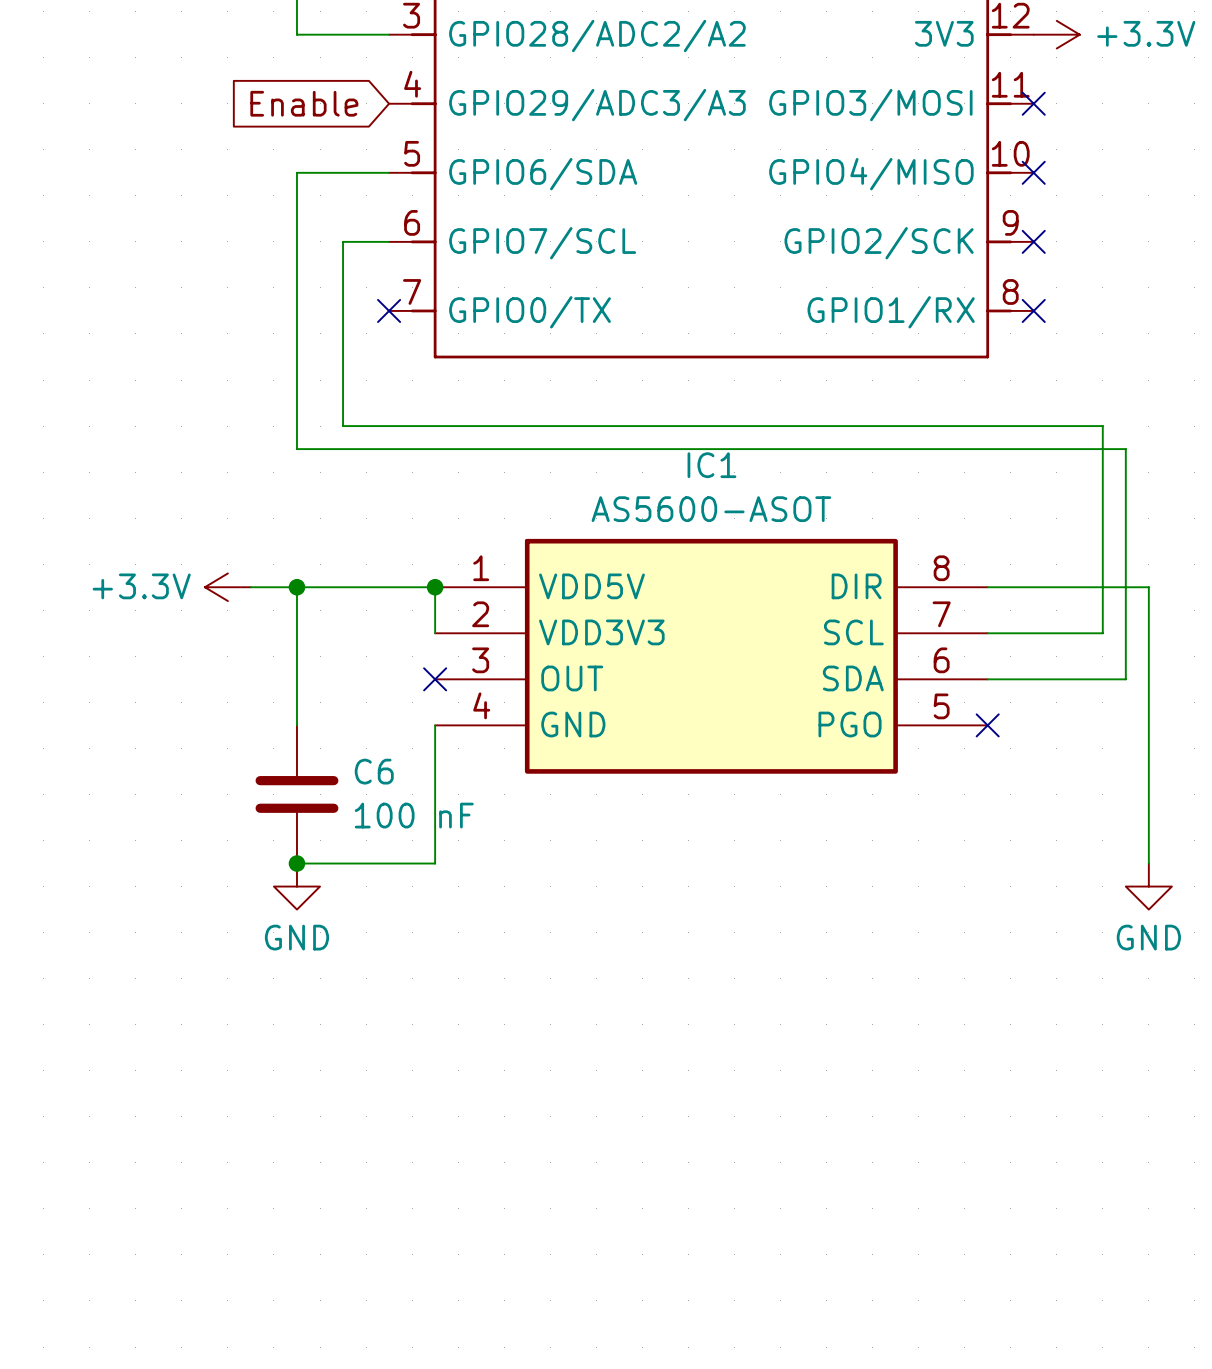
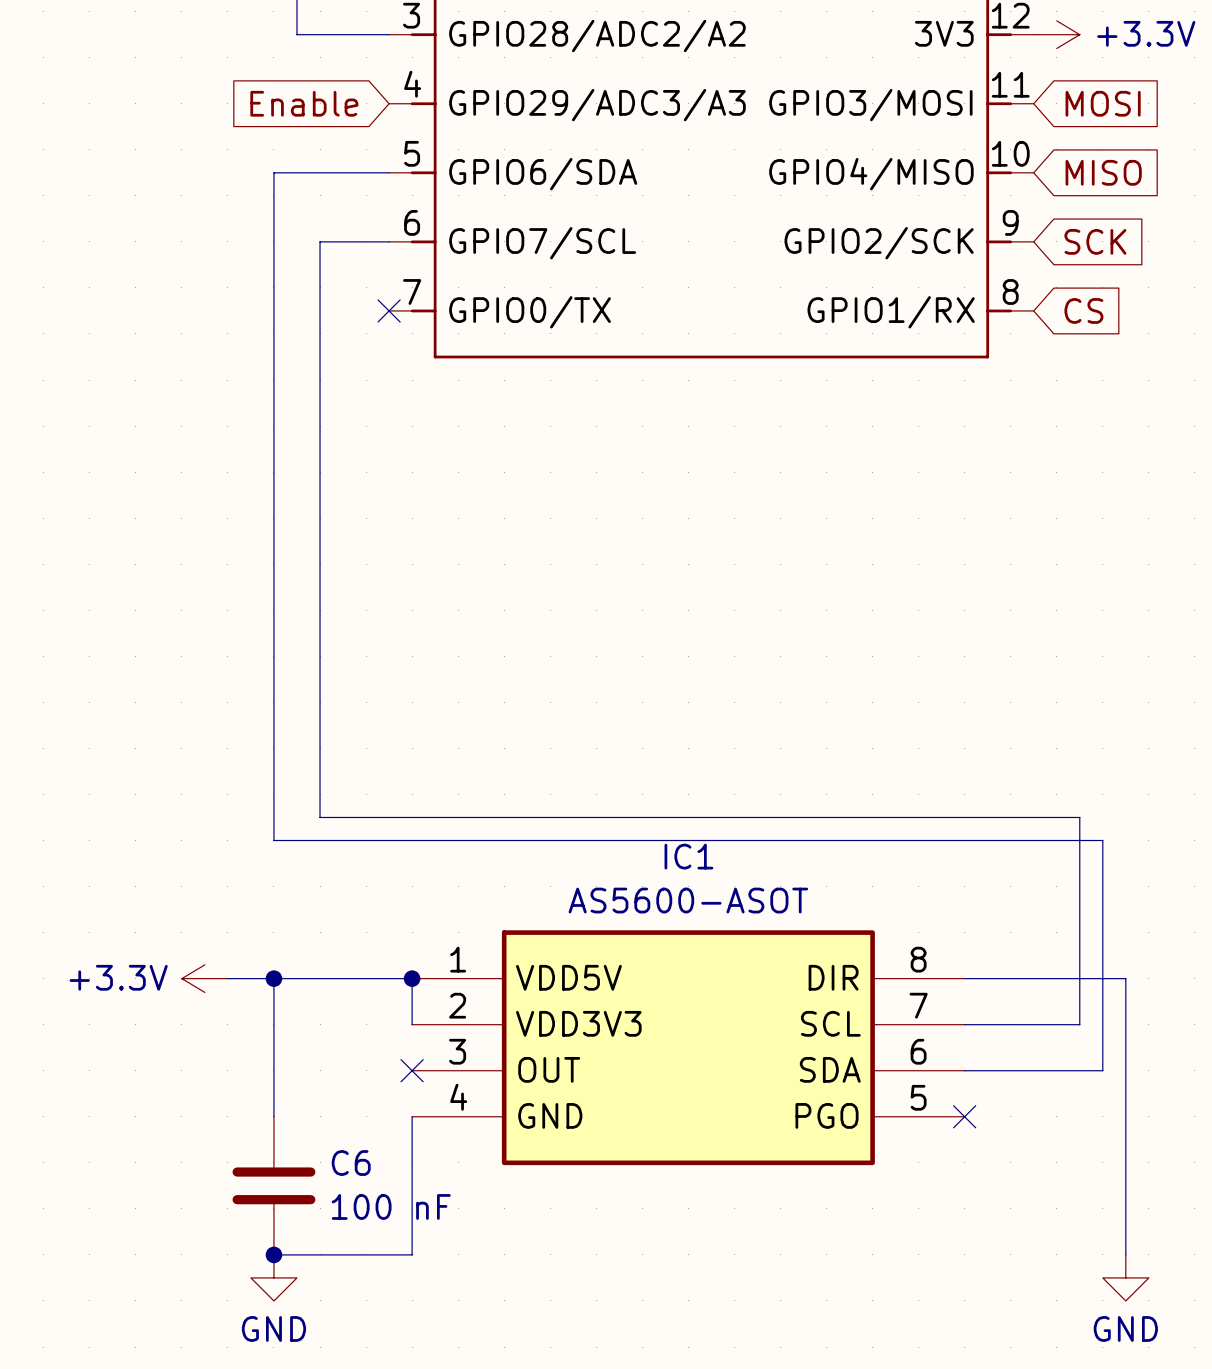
no-connect mark: (1033, 103) -> none
global label: none -> MOSI (1103, 103)
wire: (296, 172) (296, 449) (1125, 449) (1125, 679) (987, 679) -> (296, 172) (273, 172) (273, 840) (1102, 840) (1102, 1070) (964, 1070)
no-connect mark: (1033, 172) -> none
global label: none -> MISO (1103, 172)
wire: (343, 241) (343, 426) (1102, 426) (1102, 633) (987, 633) -> (343, 241) (320, 241) (320, 817) (1079, 817) (1079, 1024) (964, 1024)
no-connect mark: (1033, 241) -> none
global label: none -> SCK (1095, 241)
no-connect mark: (1033, 310) -> none
global label: none -> CS (1083, 310)
power symbol position: +3.3V (227, 587) -> +3.3V (204, 978)
wire: (250, 587) (435, 587) (435, 633) -> (227, 978) (412, 978) (412, 1024)
wire: (296, 587) (296, 725) -> (273, 978) (273, 1116)
junction: (296, 587) -> none
junction: (435, 587) -> none
wire: (987, 587) (1148, 587) (1148, 863) -> (964, 978) (1125, 978) (1125, 1254)
IC1 position: (711, 656) -> (688, 1047)
no-connect mark: (435, 679) -> none
wire: (435, 725) (435, 863) (296, 863) -> (412, 1116) (412, 1254) (273, 1254)
no-connect mark: (987, 725) -> none
C6 position: (296, 794) -> (273, 1185)
junction: (296, 863) -> none
power symbol position: GND (296, 886) -> GND (273, 1277)
power symbol position: GND (1148, 886) -> GND (1125, 1277)
junction: none -> (273, 978)
junction: none -> (412, 978)
no-connect mark: none -> (412, 1070)
no-connect mark: none -> (964, 1116)
junction: none -> (273, 1254)

